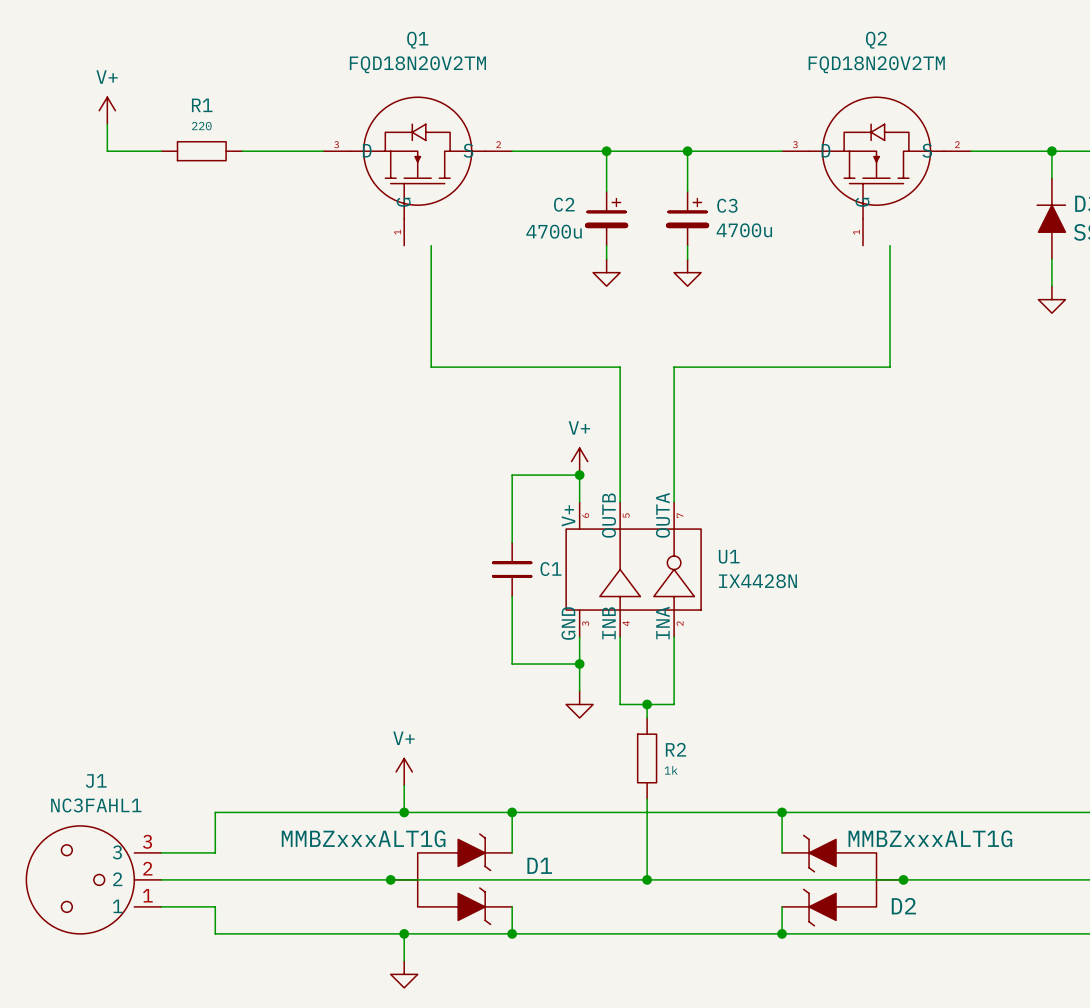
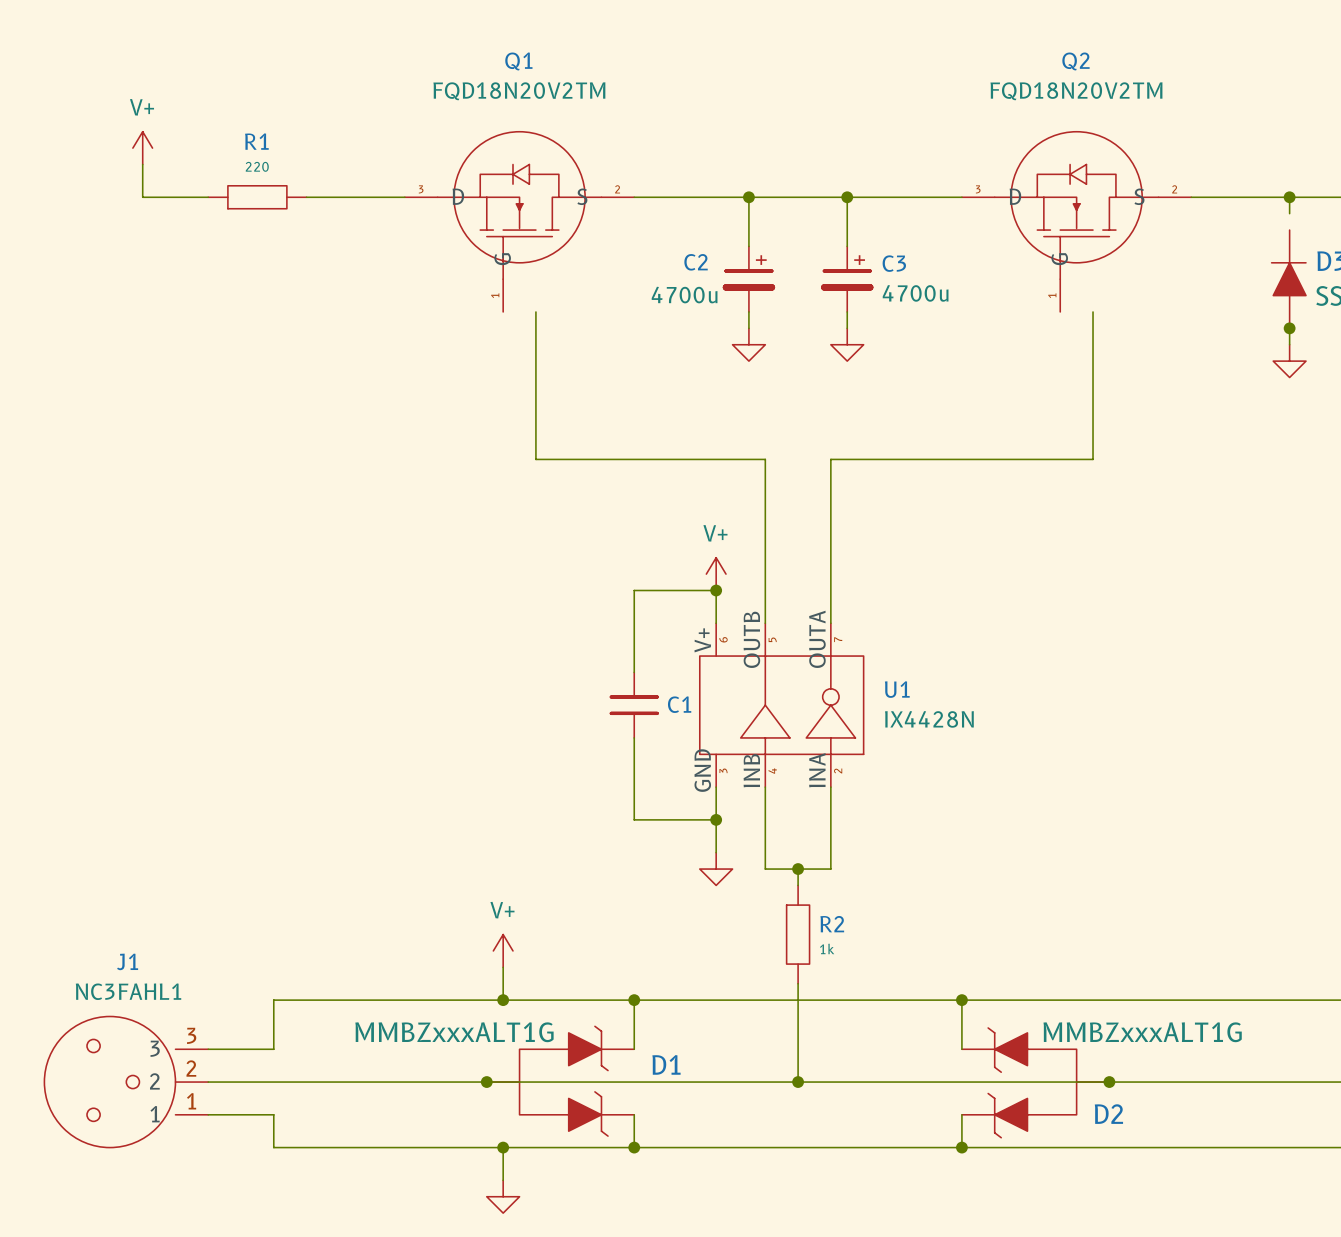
wire: (1051, 164) (1051, 178) -> none
junction: none -> (1289, 328)
power symbol position: (1051, 299) -> (1289, 361)

